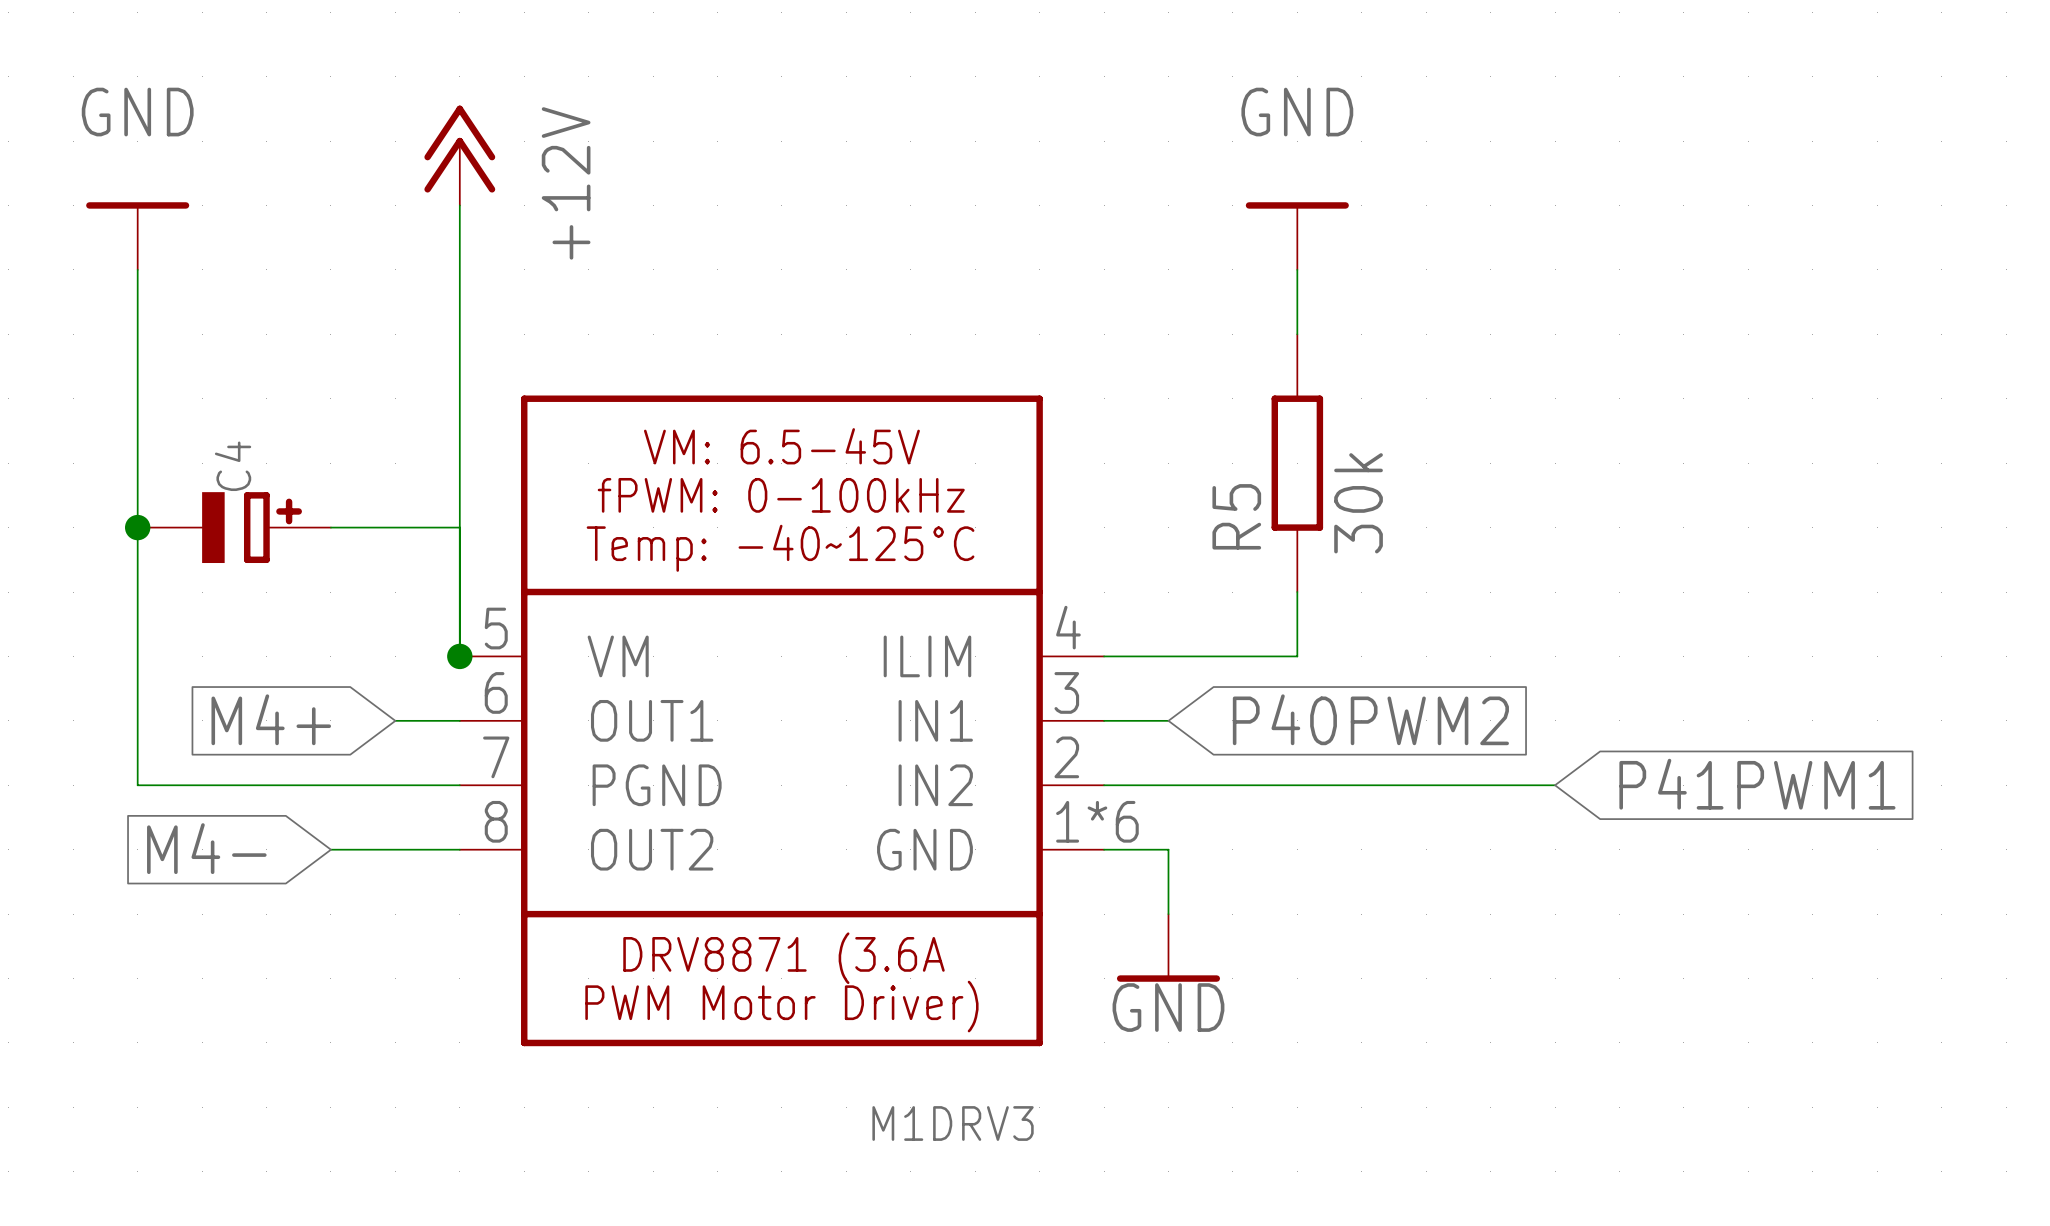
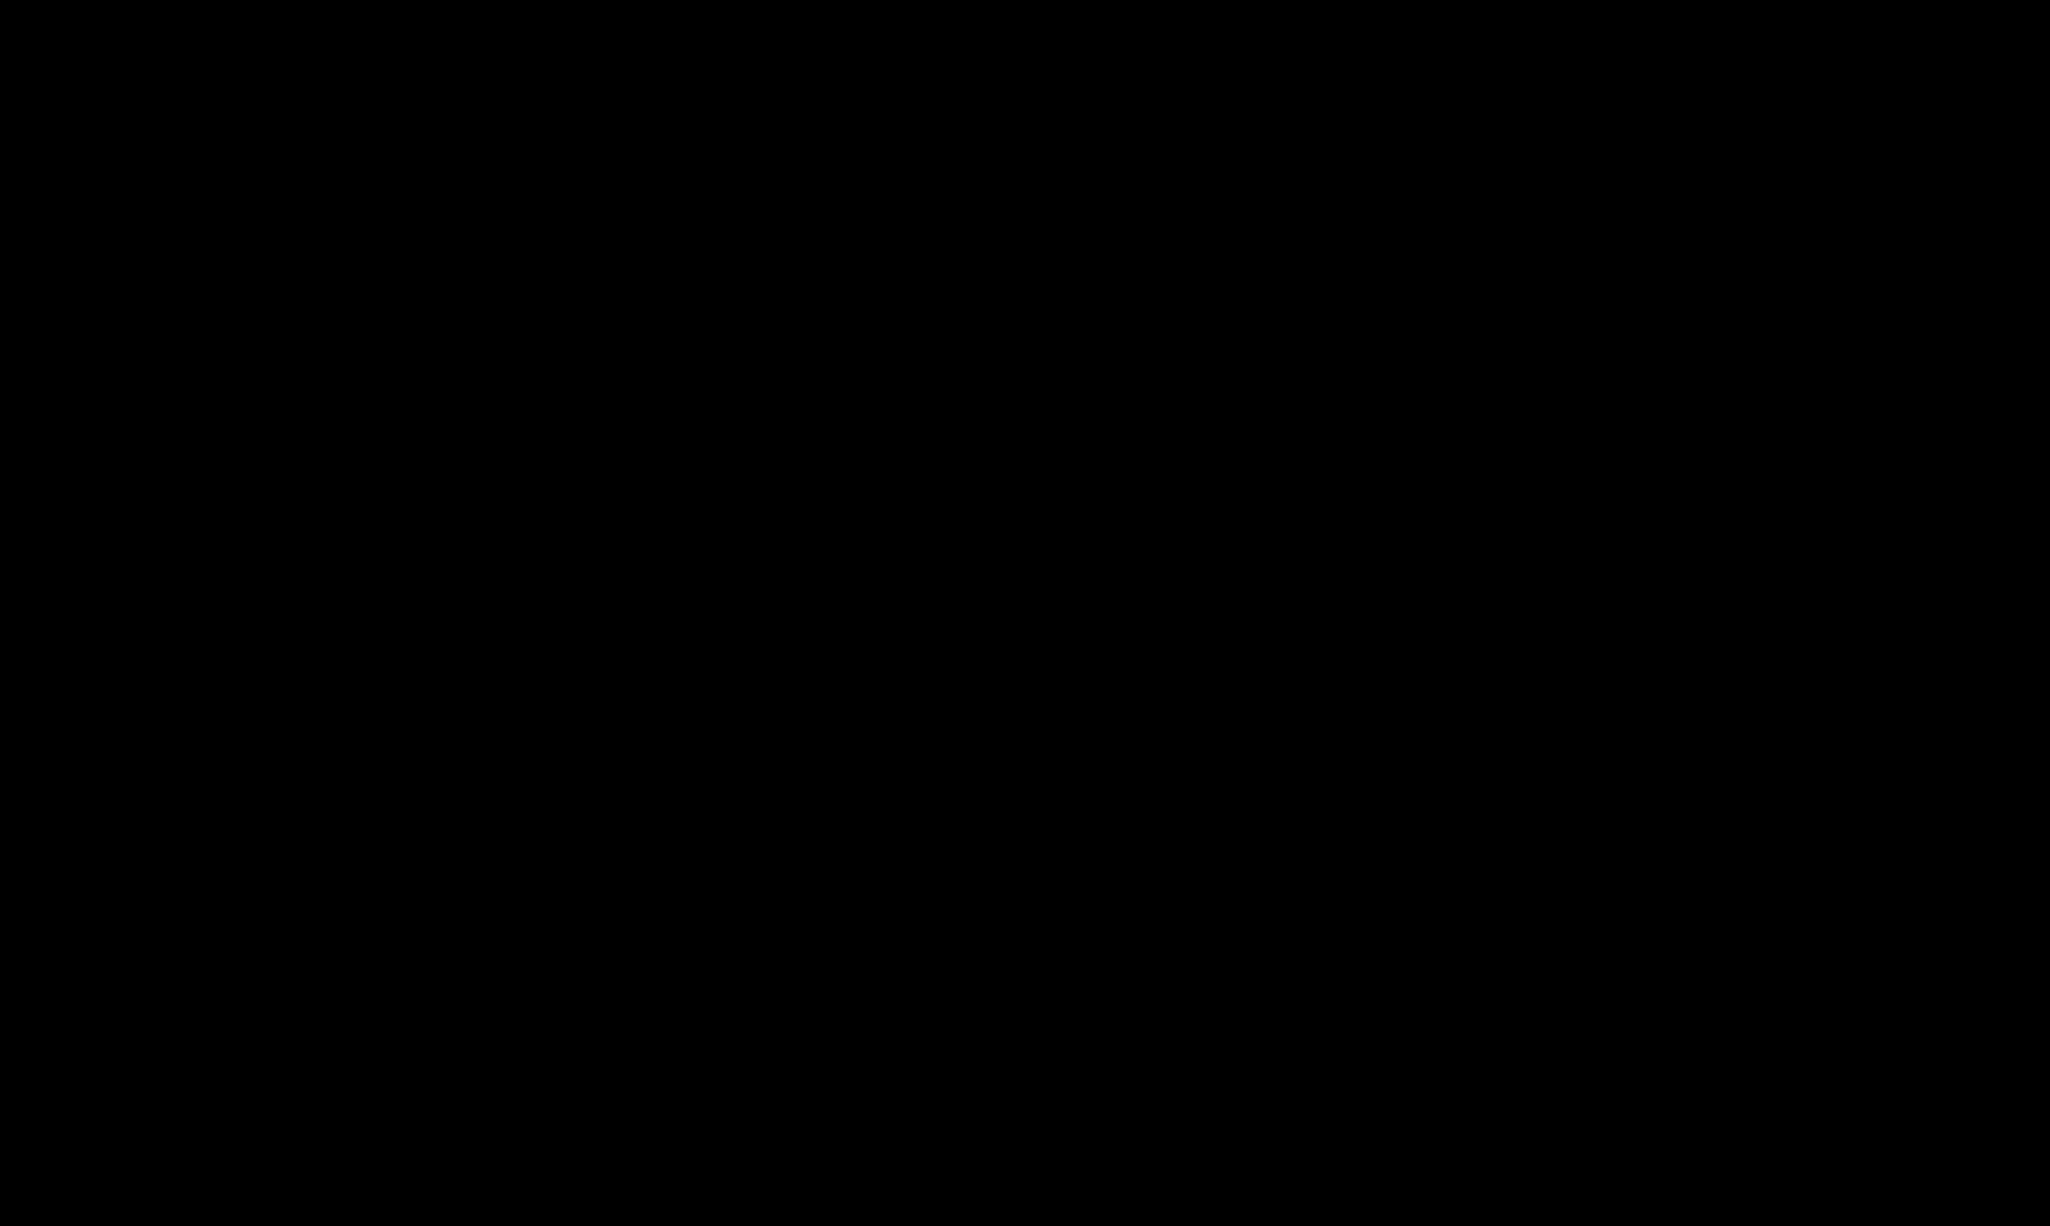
power symbol: +12V (459, 155) -> none
wire: (459, 205) (459, 656) -> none
power symbol: GND (137, 236) -> none
power symbol: GND (1297, 236) -> none
wire: (137, 269) (137, 785) (459, 785) -> none
wire: (1297, 269) (1297, 334) -> none
R5: 30k (1297, 463) -> none
junction: (137, 527) -> none
C4: (234, 527) -> none
wire: (330, 527) (459, 527) -> none
wire: (1297, 592) (1297, 656) (1104, 656) -> none
junction: (459, 656) -> none
global label: M4+ (271, 719) -> none
global label: P40PWM2 (1370, 719) -> none
wire: (395, 720) (459, 720) -> none
M1DRV3: (781, 720) -> none
wire: (1104, 720) (1168, 720) -> none
global label: P41PWM1 (1757, 784) -> none
wire: (1104, 785) (1555, 785) -> none
global label: M4- (206, 848) -> none
wire: (330, 849) (459, 849) -> none
wire: (1104, 849) (1168, 849) (1168, 914) -> none
power symbol: GND (1168, 947) -> none

